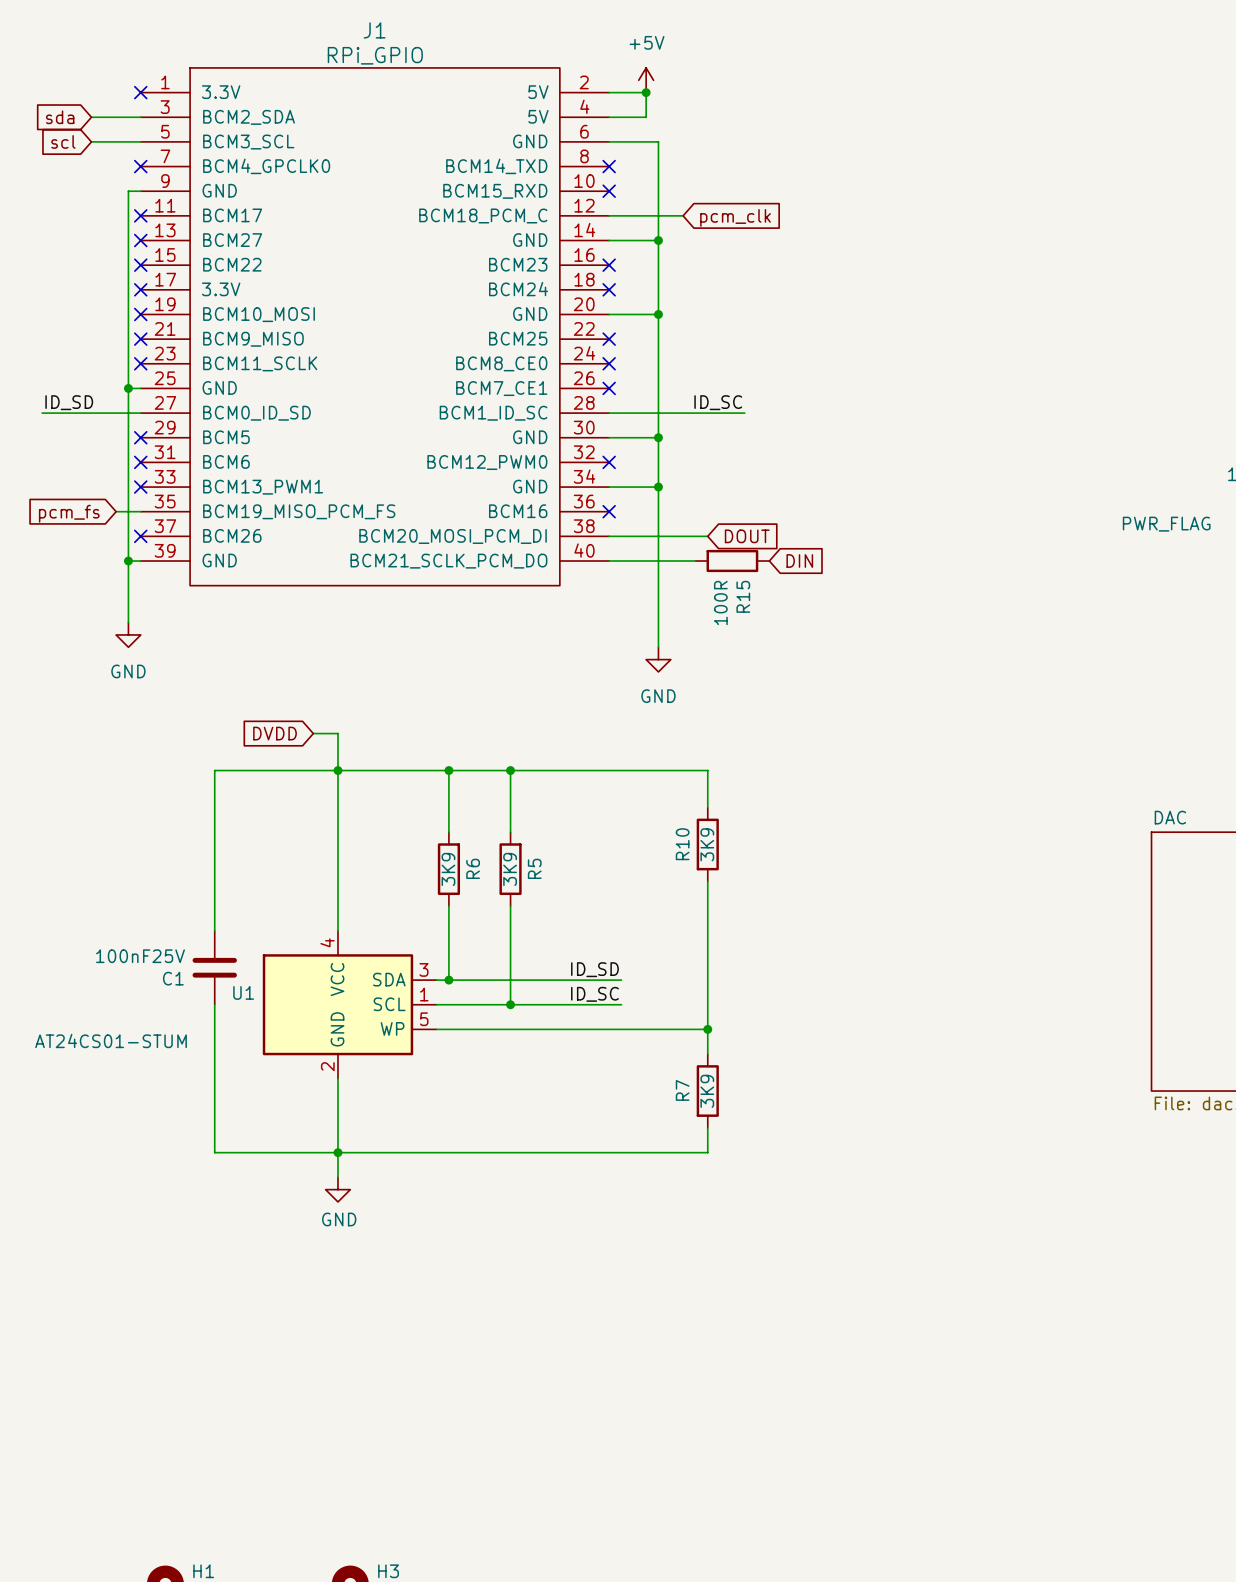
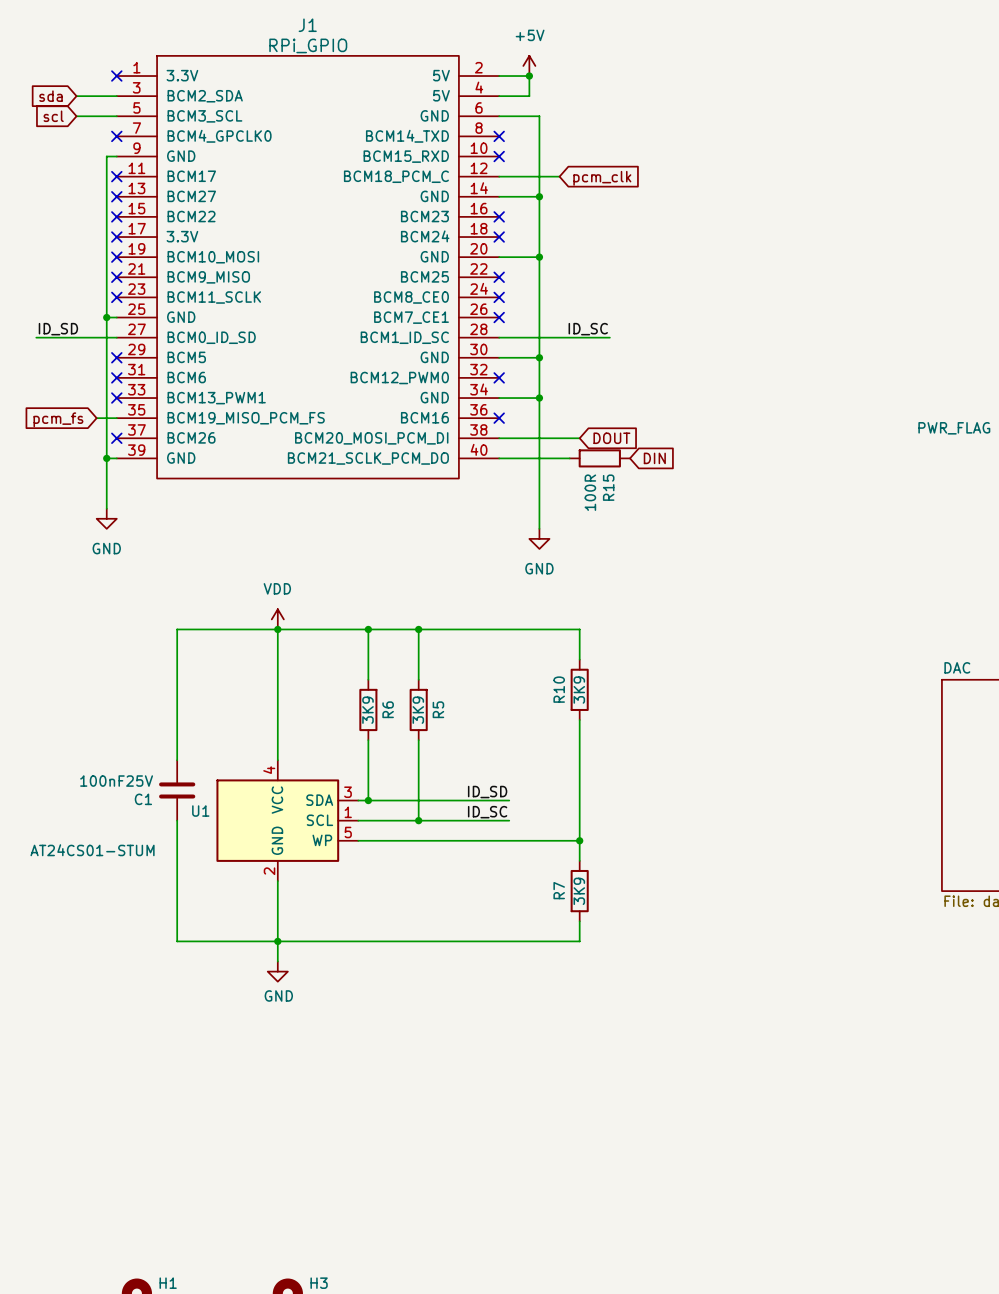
global label: DVDD (275, 733) -> none
wire: (313, 733) (337, 733) (337, 770) -> none
power symbol: none -> VDD (277, 619)

